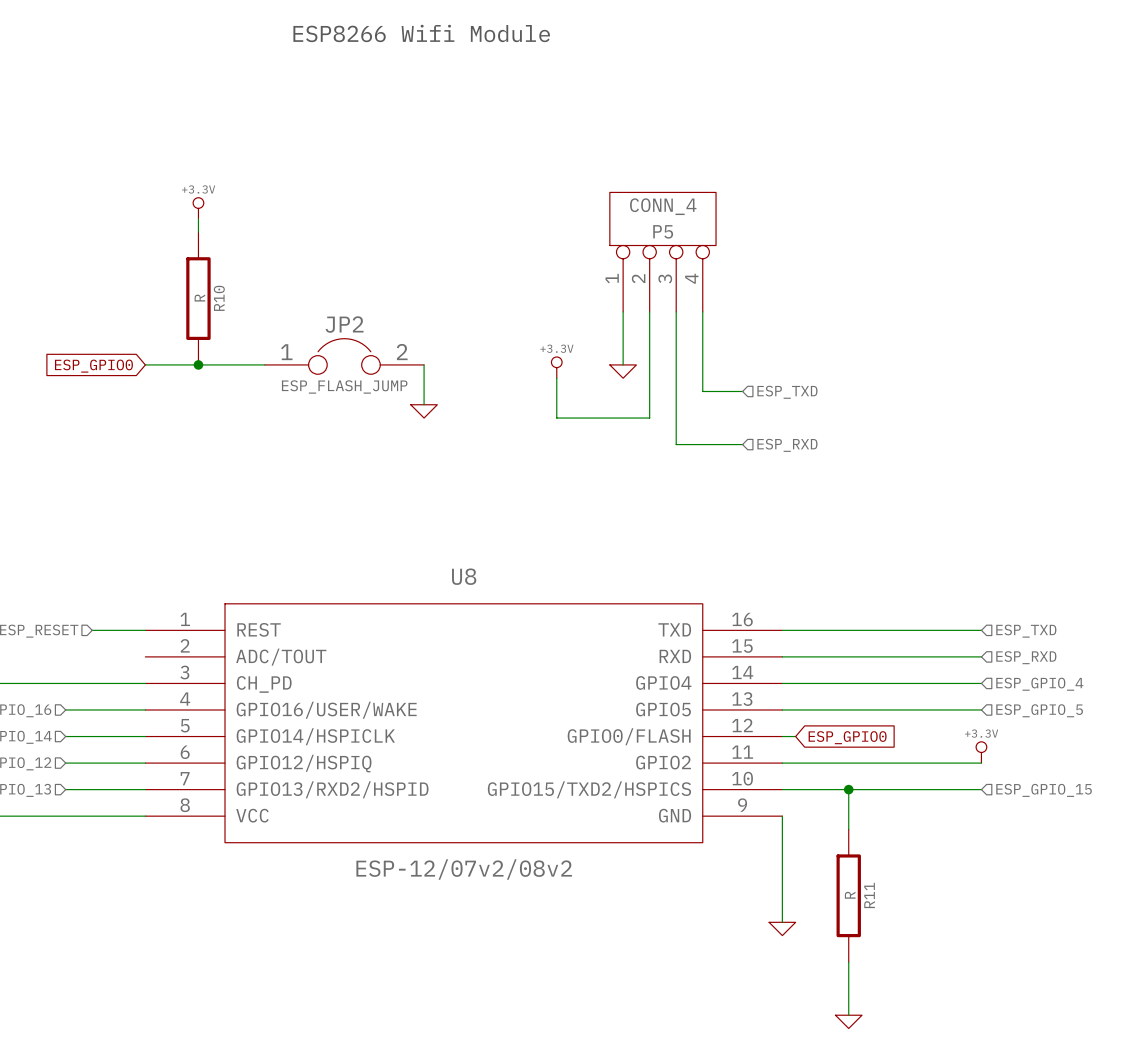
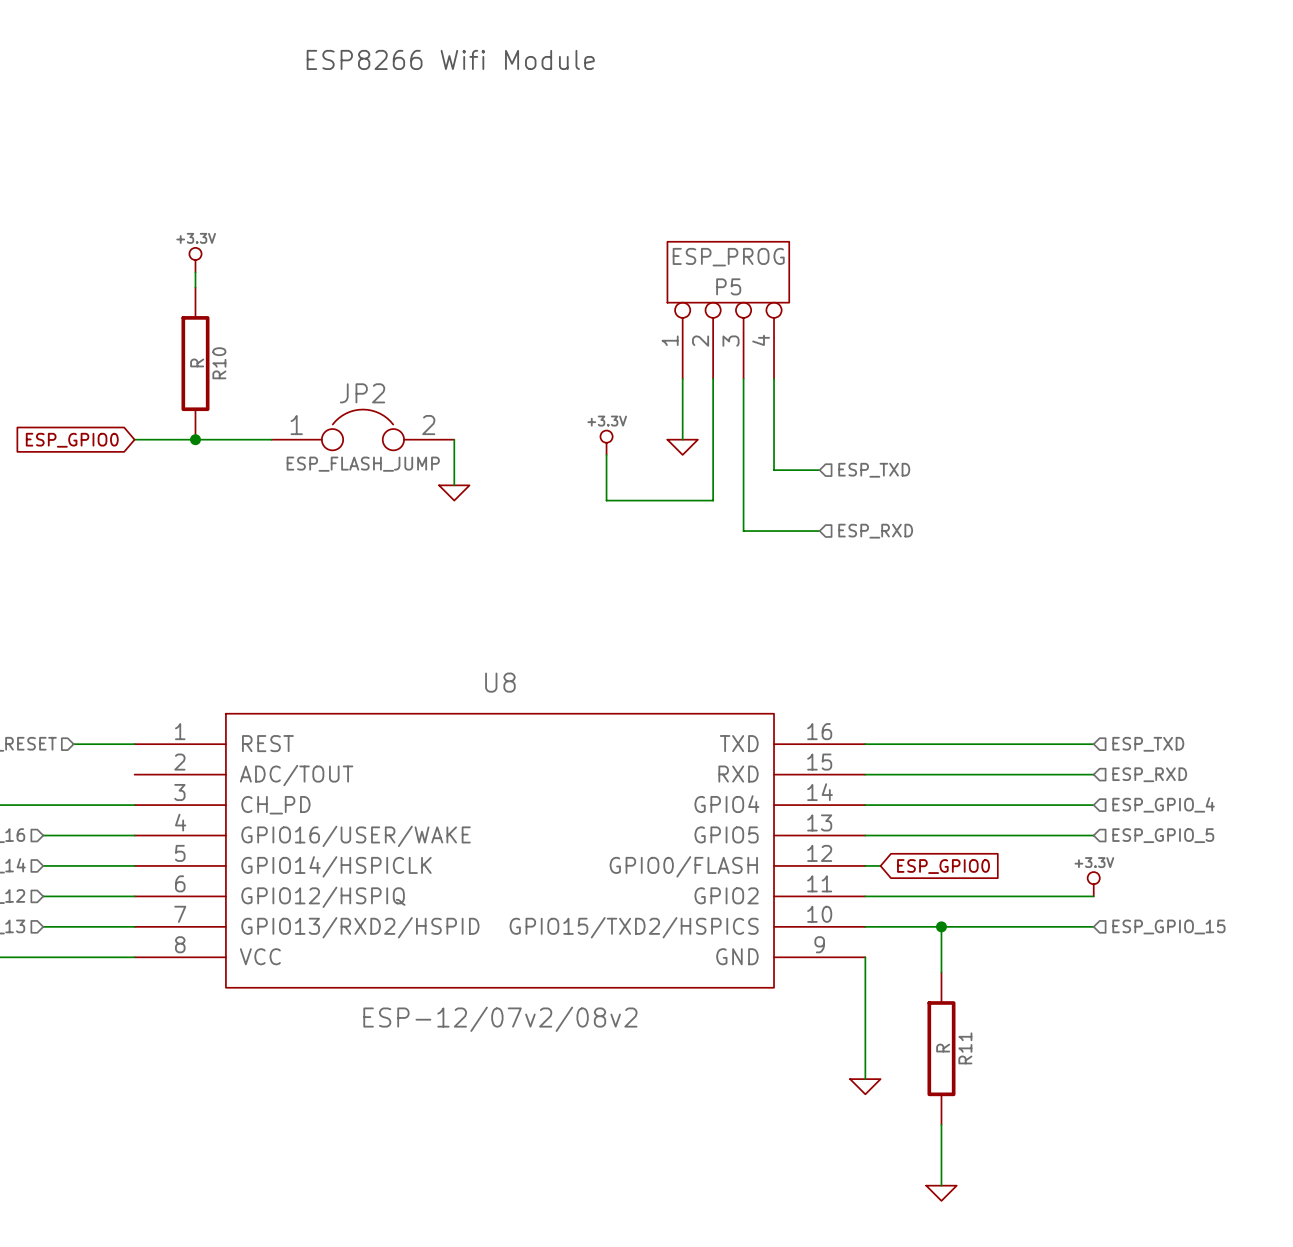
P5 value: CONN_4 (663, 206) -> ESP_PROG (728, 257)

